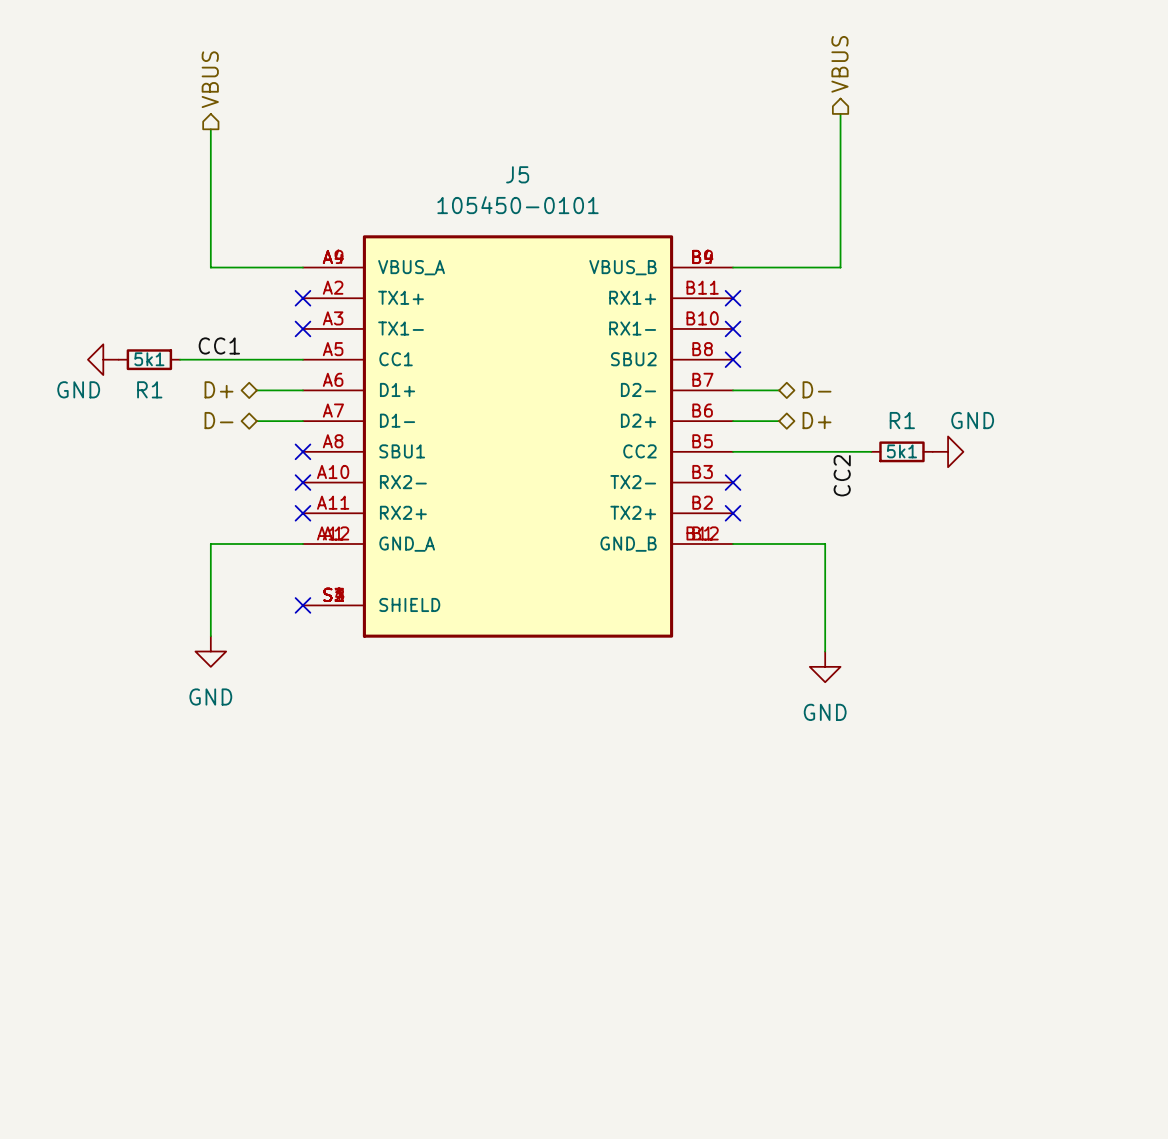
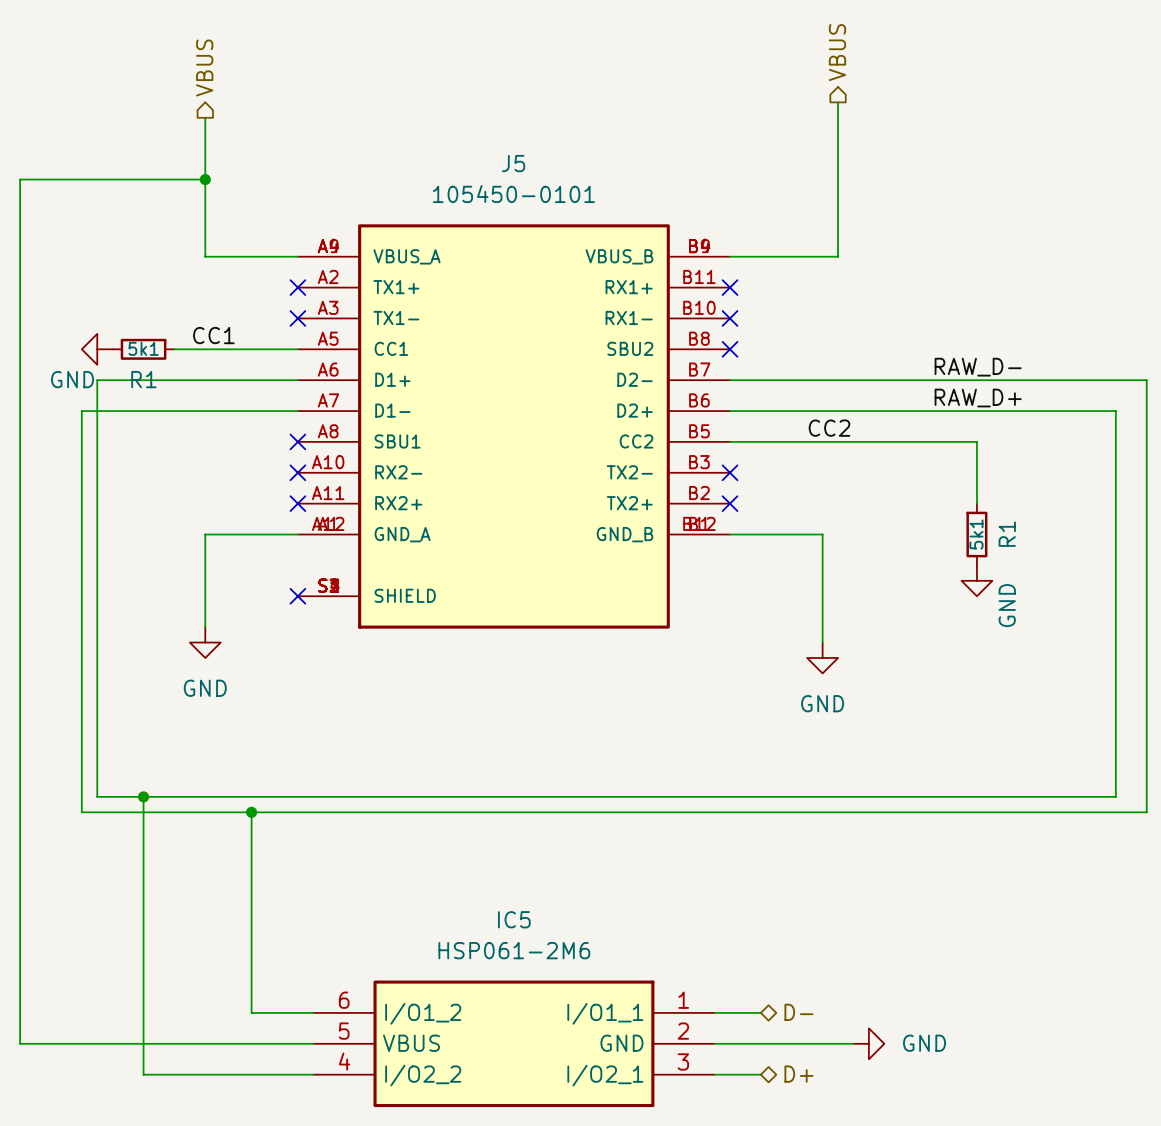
wire: none -> (205, 179) (20, 179) (20, 1043) (313, 1043)
junction: none -> (205, 179)
label: none -> RAW_D- (978, 367)
hierarchical label: D+ (218, 389) -> none
hierarchical label: D- (817, 389) -> none
wire: none -> (251, 380) (97, 380) (97, 796) (1115, 796) (1115, 411) (776, 411)
wire: none -> (776, 380) (1146, 380) (1146, 812) (81, 812) (81, 411) (251, 411)
label: none -> RAW_D+ (978, 398)
hierarchical label: D- (218, 420) -> none
hierarchical label: D+ (817, 420) -> none
wire: none -> (868, 441) (976, 441) (976, 503)
R1 rotation: 0° (901, 451) -> 90° clockwise (976, 534)
R1 position: (901, 451) -> (976, 534)
power symbol rotation: 0° (948, 451) -> 90° clockwise (976, 580)
power symbol position: GND (948, 451) -> GND (976, 580)
label rotation: 0° (842, 475) -> 90° clockwise (829, 428)
wire: none -> (143, 796) (143, 1074) (313, 1074)
junction: none -> (143, 796)
wire: none -> (251, 812) (251, 1012) (313, 1012)
junction: none -> (251, 812)
hierarchical label: none -> D- (798, 1012)
wire: none -> (714, 1012) (760, 1012)
IC5: none -> HSP061-2M6 (513, 1043)
wire: none -> (714, 1043) (853, 1043)
power symbol: none -> GND (868, 1043)
hierarchical label: none -> D+ (798, 1074)
wire: none -> (714, 1074) (760, 1074)

